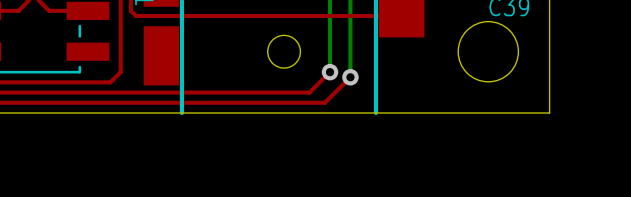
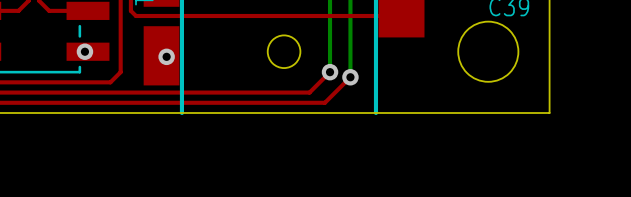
via: none -> (84, 51)
via: none -> (166, 56)

